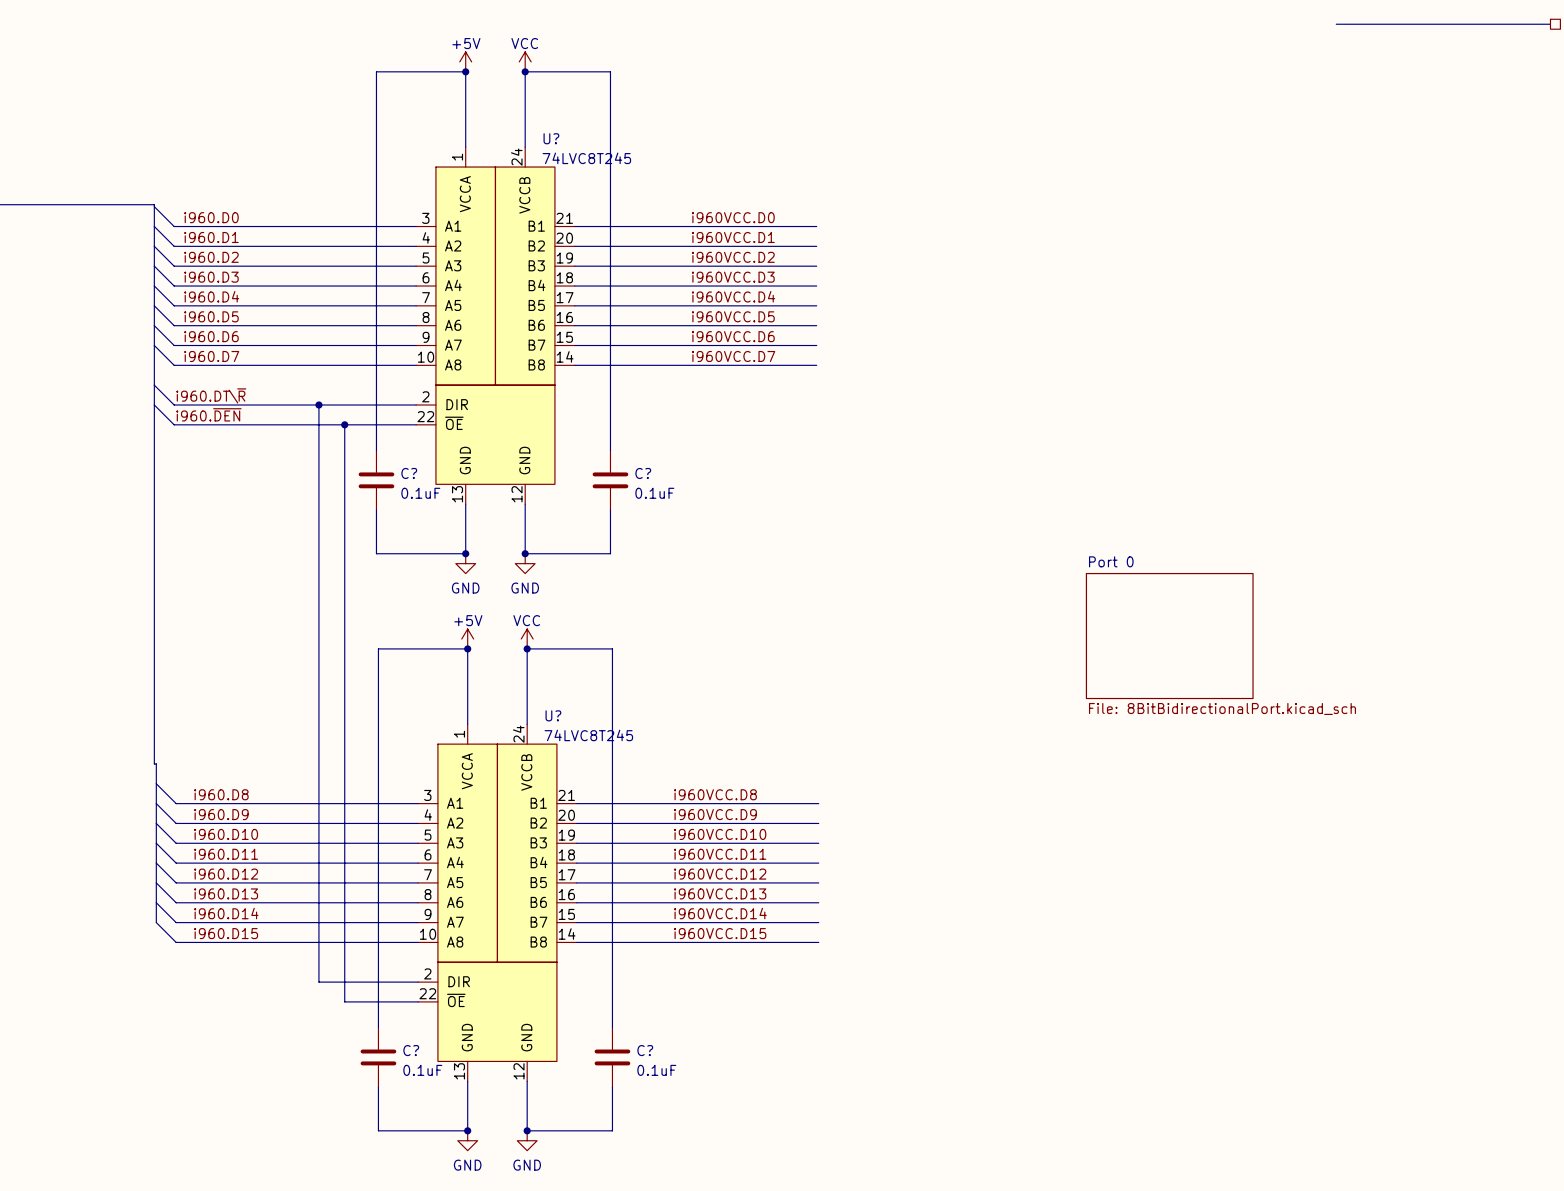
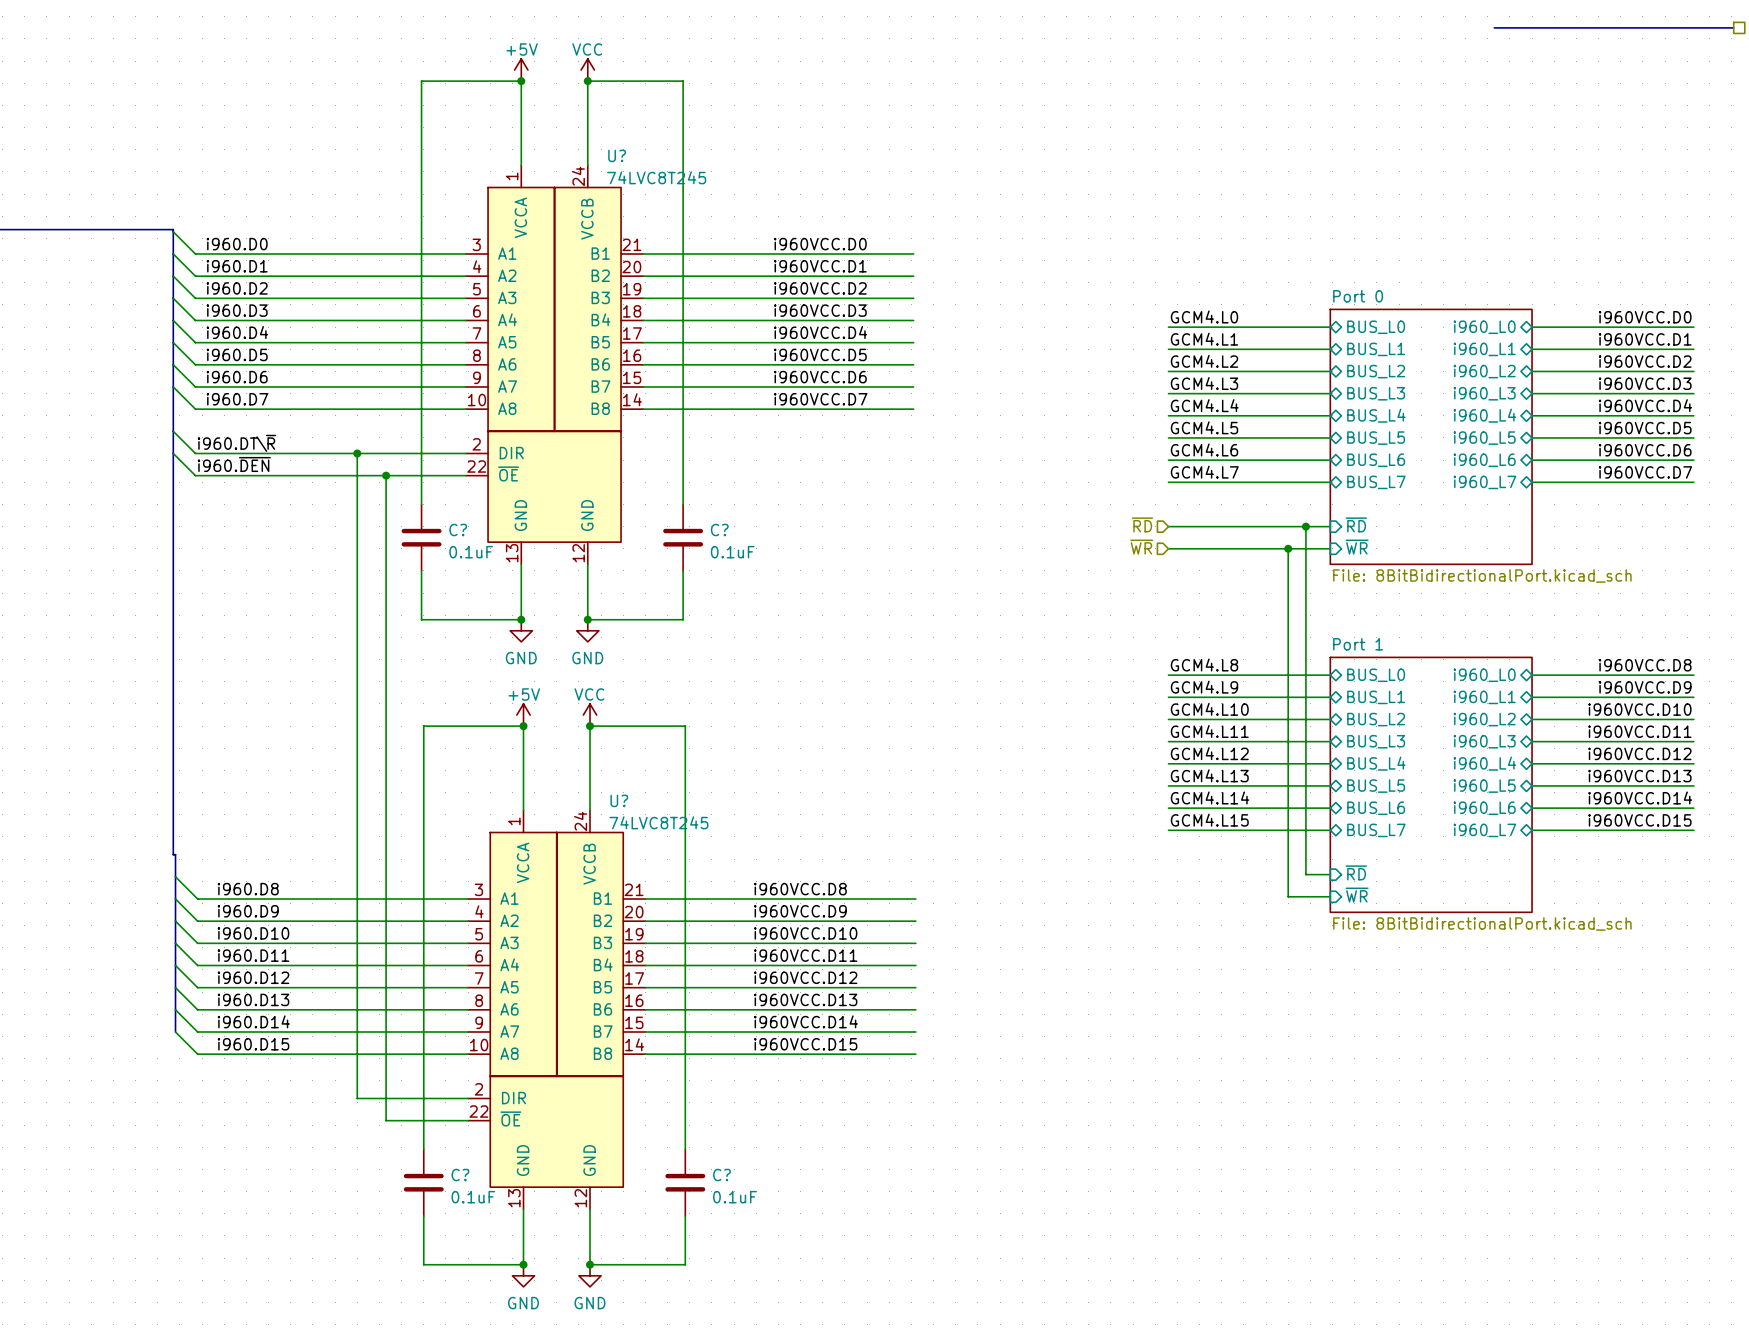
label: none -> GCM4.L0 (1204, 316)
label: none -> i960VCC.D0 (1645, 317)
wire: none -> (1168, 327) (1330, 327)
wire: none -> (1532, 327) (1693, 327)
sheet pin: none -> BUS_L0 (1376, 327)
sheet pin: none -> i960_L0 (1484, 327)
label: none -> GCM4.L1 (1204, 339)
label: none -> i960VCC.D1 (1645, 339)
wire: none -> (1168, 349) (1330, 349)
sheet pin: none -> BUS_L1 (1376, 349)
sheet pin: none -> i960_L1 (1484, 349)
wire: none -> (1532, 349) (1693, 349)
label: none -> GCM4.L2 (1204, 361)
label: none -> i960VCC.D2 (1645, 361)
wire: none -> (1168, 371) (1330, 371)
sheet pin: none -> BUS_L2 (1376, 371)
sheet pin: none -> i960_L2 (1484, 371)
wire: none -> (1532, 371) (1693, 371)
label: none -> GCM4.L3 (1204, 383)
label: none -> i960VCC.D3 (1645, 383)
wire: none -> (1168, 393) (1330, 393)
sheet pin: none -> BUS_L3 (1376, 393)
sheet pin: none -> i960_L3 (1484, 393)
wire: none -> (1532, 393) (1693, 393)
label: none -> GCM4.L4 (1204, 405)
label: none -> i960VCC.D4 (1645, 405)
wire: none -> (1168, 415) (1330, 415)
sheet pin: none -> BUS_L4 (1376, 415)
sheet pin: none -> i960_L4 (1484, 415)
wire: none -> (1532, 415) (1693, 415)
label: none -> GCM4.L5 (1204, 427)
label: none -> i960VCC.D5 (1645, 428)
wire: none -> (1168, 437) (1330, 437)
sheet pin: none -> BUS_L5 (1376, 438)
sheet pin: none -> i960_L5 (1484, 438)
wire: none -> (1532, 437) (1693, 437)
label: none -> GCM4.L6 (1204, 449)
label: none -> i960VCC.D6 (1645, 450)
wire: none -> (1168, 460) (1330, 460)
wire: none -> (1532, 460) (1693, 460)
sheet pin: none -> BUS_L6 (1376, 460)
sheet pin: none -> i960_L6 (1484, 460)
label: none -> GCM4.L7 (1204, 472)
label: none -> i960VCC.D7 (1645, 472)
wire: none -> (1168, 482) (1330, 482)
sheet pin: none -> BUS_L7 (1376, 482)
sheet pin: none -> i960_L7 (1484, 482)
wire: none -> (1532, 482) (1693, 482)
hierarchical label: none -> ~{RD} (1142, 524)
sheet pin: none -> ~{RD} (1356, 524)
wire: none -> (1168, 526) (1330, 526)
wire: none -> (1305, 526) (1305, 874) (1330, 874)
junction: none -> (1305, 526)
hierarchical label: none -> ~{WR} (1141, 547)
sheet pin: none -> ~{WR} (1357, 547)
wire: none -> (1168, 548) (1330, 548)
wire: none -> (1288, 548) (1288, 896) (1330, 896)
junction: none -> (1288, 548)
sheet Port 0 name position: Port 0 (1111, 561) -> Port 0 (1358, 296)
sheet Port 0 shape: [1085, 572, 1254, 700] -> [1329, 308, 1533, 565]
label: none -> GCM4.L8 (1204, 664)
label: none -> i960VCC.D8 (1645, 665)
wire: none -> (1168, 675) (1330, 675)
sheet pin: none -> BUS_L0 (1376, 675)
sheet pin: none -> i960_L0 (1484, 675)
wire: none -> (1532, 675) (1693, 675)
label: none -> GCM4.L9 (1204, 687)
label: none -> i960VCC.D9 (1645, 687)
wire: none -> (1168, 697) (1330, 697)
sheet pin: none -> BUS_L1 (1376, 697)
sheet pin: none -> i960_L1 (1484, 697)
wire: none -> (1532, 697) (1693, 697)
label: none -> GCM4.L10 (1209, 709)
label: none -> i960VCC.D10 (1639, 709)
wire: none -> (1168, 719) (1330, 719)
wire: none -> (1532, 719) (1693, 719)
sheet pin: none -> BUS_L2 (1376, 719)
sheet pin: none -> i960_L2 (1484, 719)
label: none -> GCM4.L11 (1209, 731)
label: none -> i960VCC.D11 (1639, 731)
wire: none -> (1168, 741) (1330, 741)
sheet pin: none -> BUS_L3 (1376, 741)
sheet pin: none -> i960_L3 (1484, 741)
wire: none -> (1532, 741) (1693, 741)
label: none -> GCM4.L12 (1209, 753)
label: none -> i960VCC.D12 (1639, 753)
wire: none -> (1168, 763) (1330, 763)
sheet pin: none -> BUS_L4 (1376, 763)
sheet pin: none -> i960_L4 (1484, 763)
wire: none -> (1532, 763) (1693, 763)
label: none -> GCM4.L13 (1209, 775)
label: none -> i960VCC.D13 (1639, 776)
sheet Port 1: none -> File: 8BitBidirectionalPort.kicad_sch (1431, 784)
wire: none -> (1168, 785) (1330, 785)
sheet pin: none -> BUS_L5 (1376, 786)
sheet pin: none -> i960_L5 (1484, 786)
wire: none -> (1532, 785) (1693, 785)
sheet Port 0 value position: File: 8BitBidirectionalPort.kicad_sch (1222, 708) -> File: 8BitBidirectionalPort.kicad_sch (1482, 576)
label: none -> GCM4.L14 (1210, 797)
label: none -> i960VCC.D14 (1640, 797)
wire: none -> (1168, 808) (1330, 808)
sheet pin: none -> BUS_L6 (1376, 808)
sheet pin: none -> i960_L6 (1484, 808)
wire: none -> (1532, 808) (1693, 808)
label: none -> GCM4.L15 (1209, 820)
label: none -> i960VCC.D15 (1639, 820)
wire: none -> (1168, 830) (1330, 830)
sheet pin: none -> BUS_L7 (1376, 830)
sheet pin: none -> i960_L7 (1484, 830)
wire: none -> (1532, 830) (1693, 830)
sheet pin: none -> ~{RD} (1356, 872)
sheet pin: none -> ~{WR} (1357, 895)

